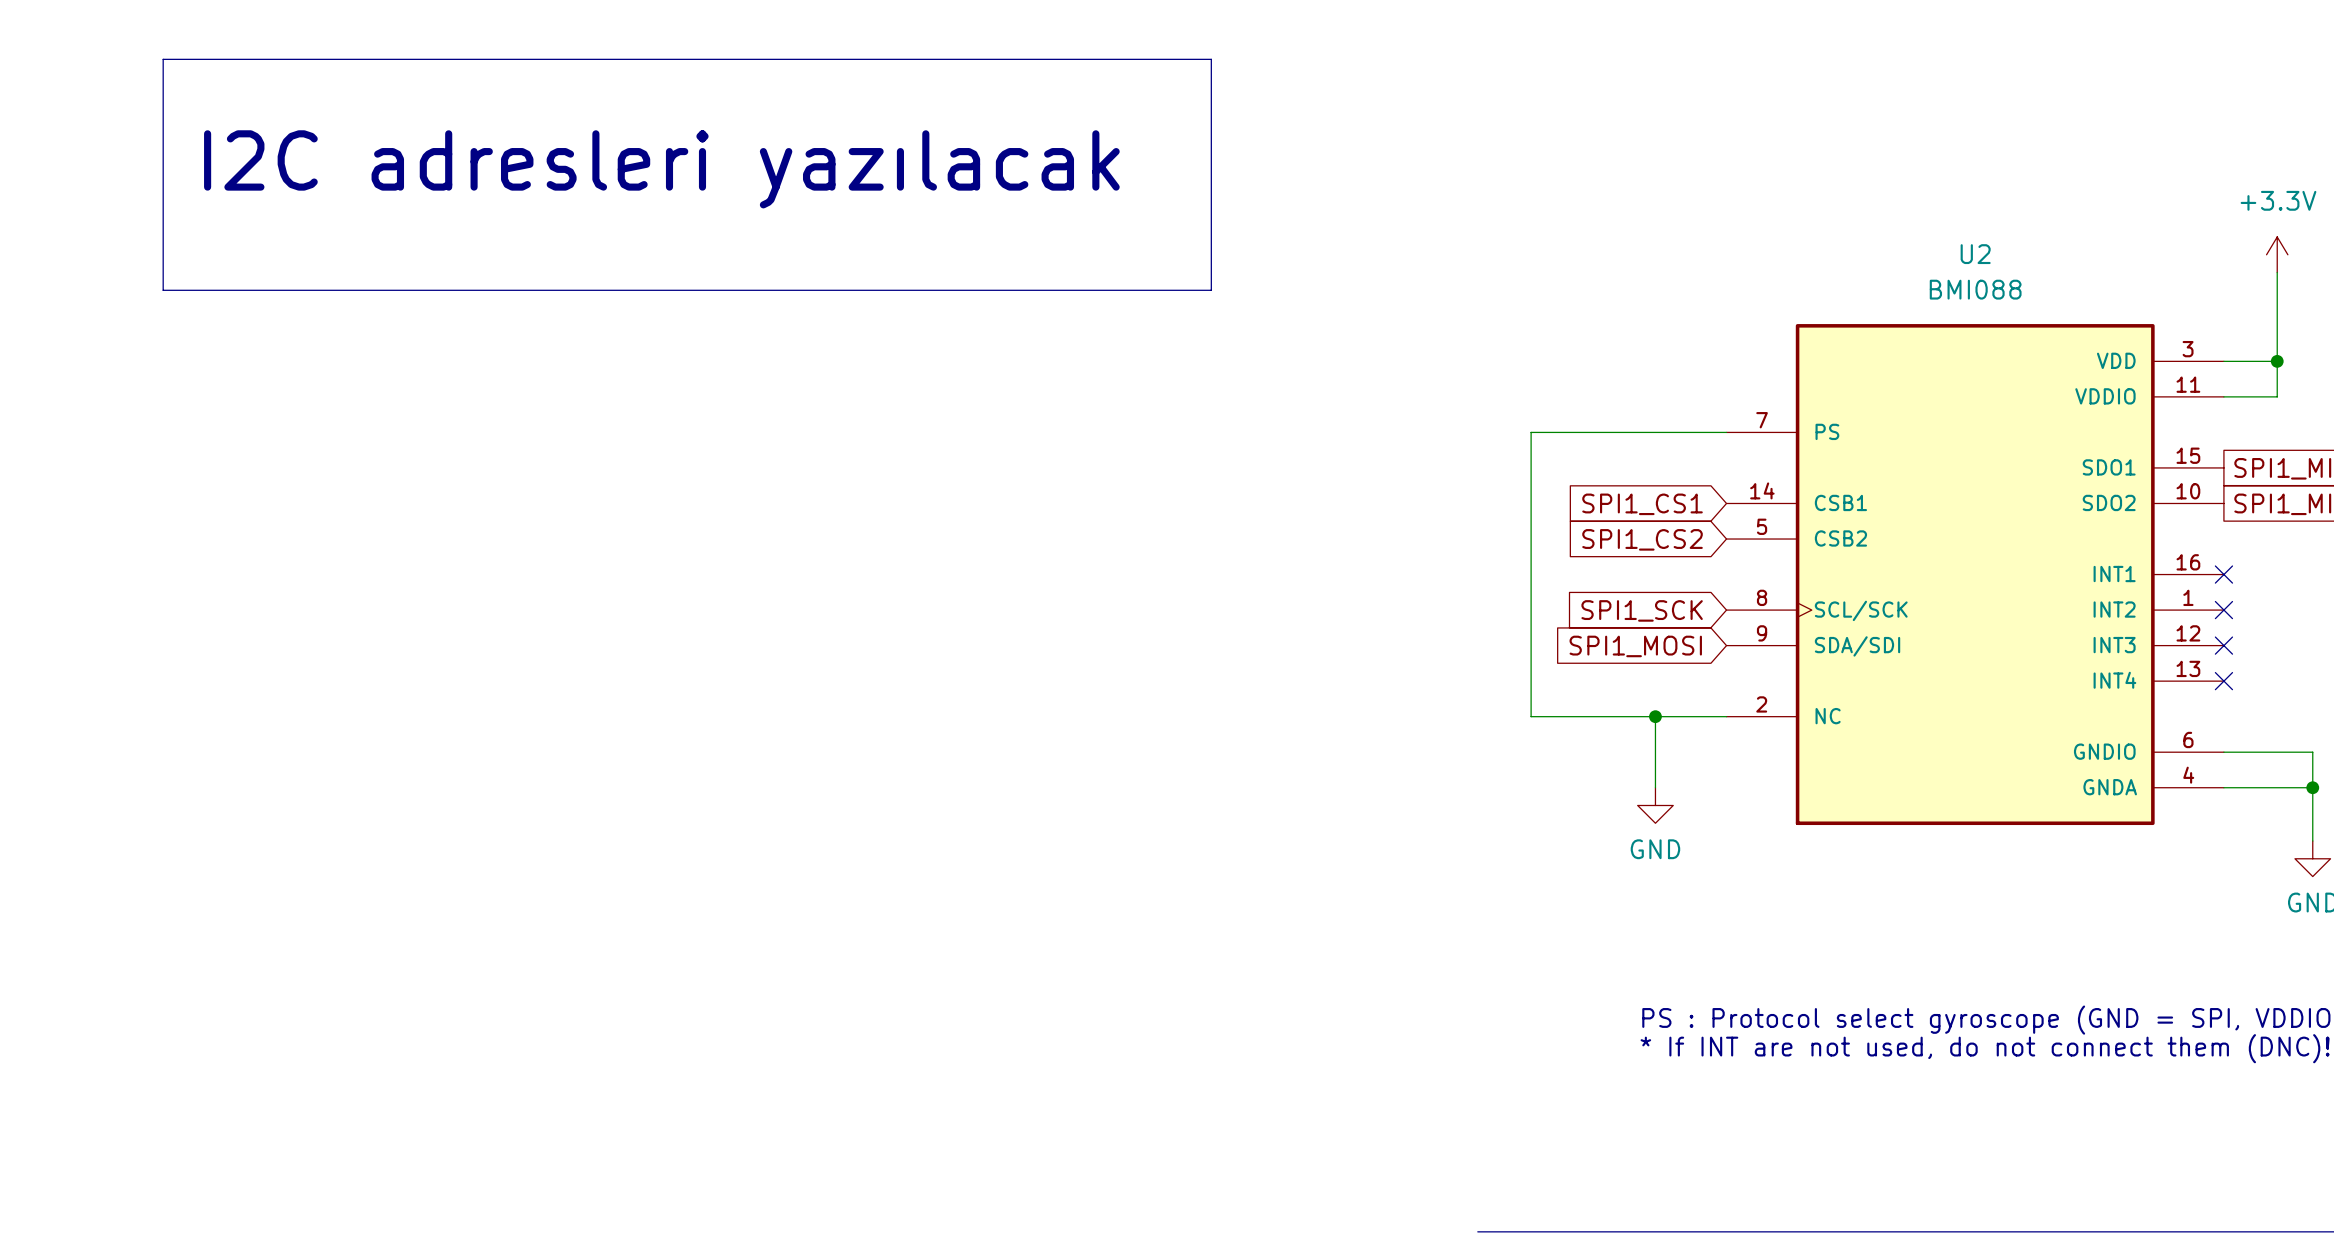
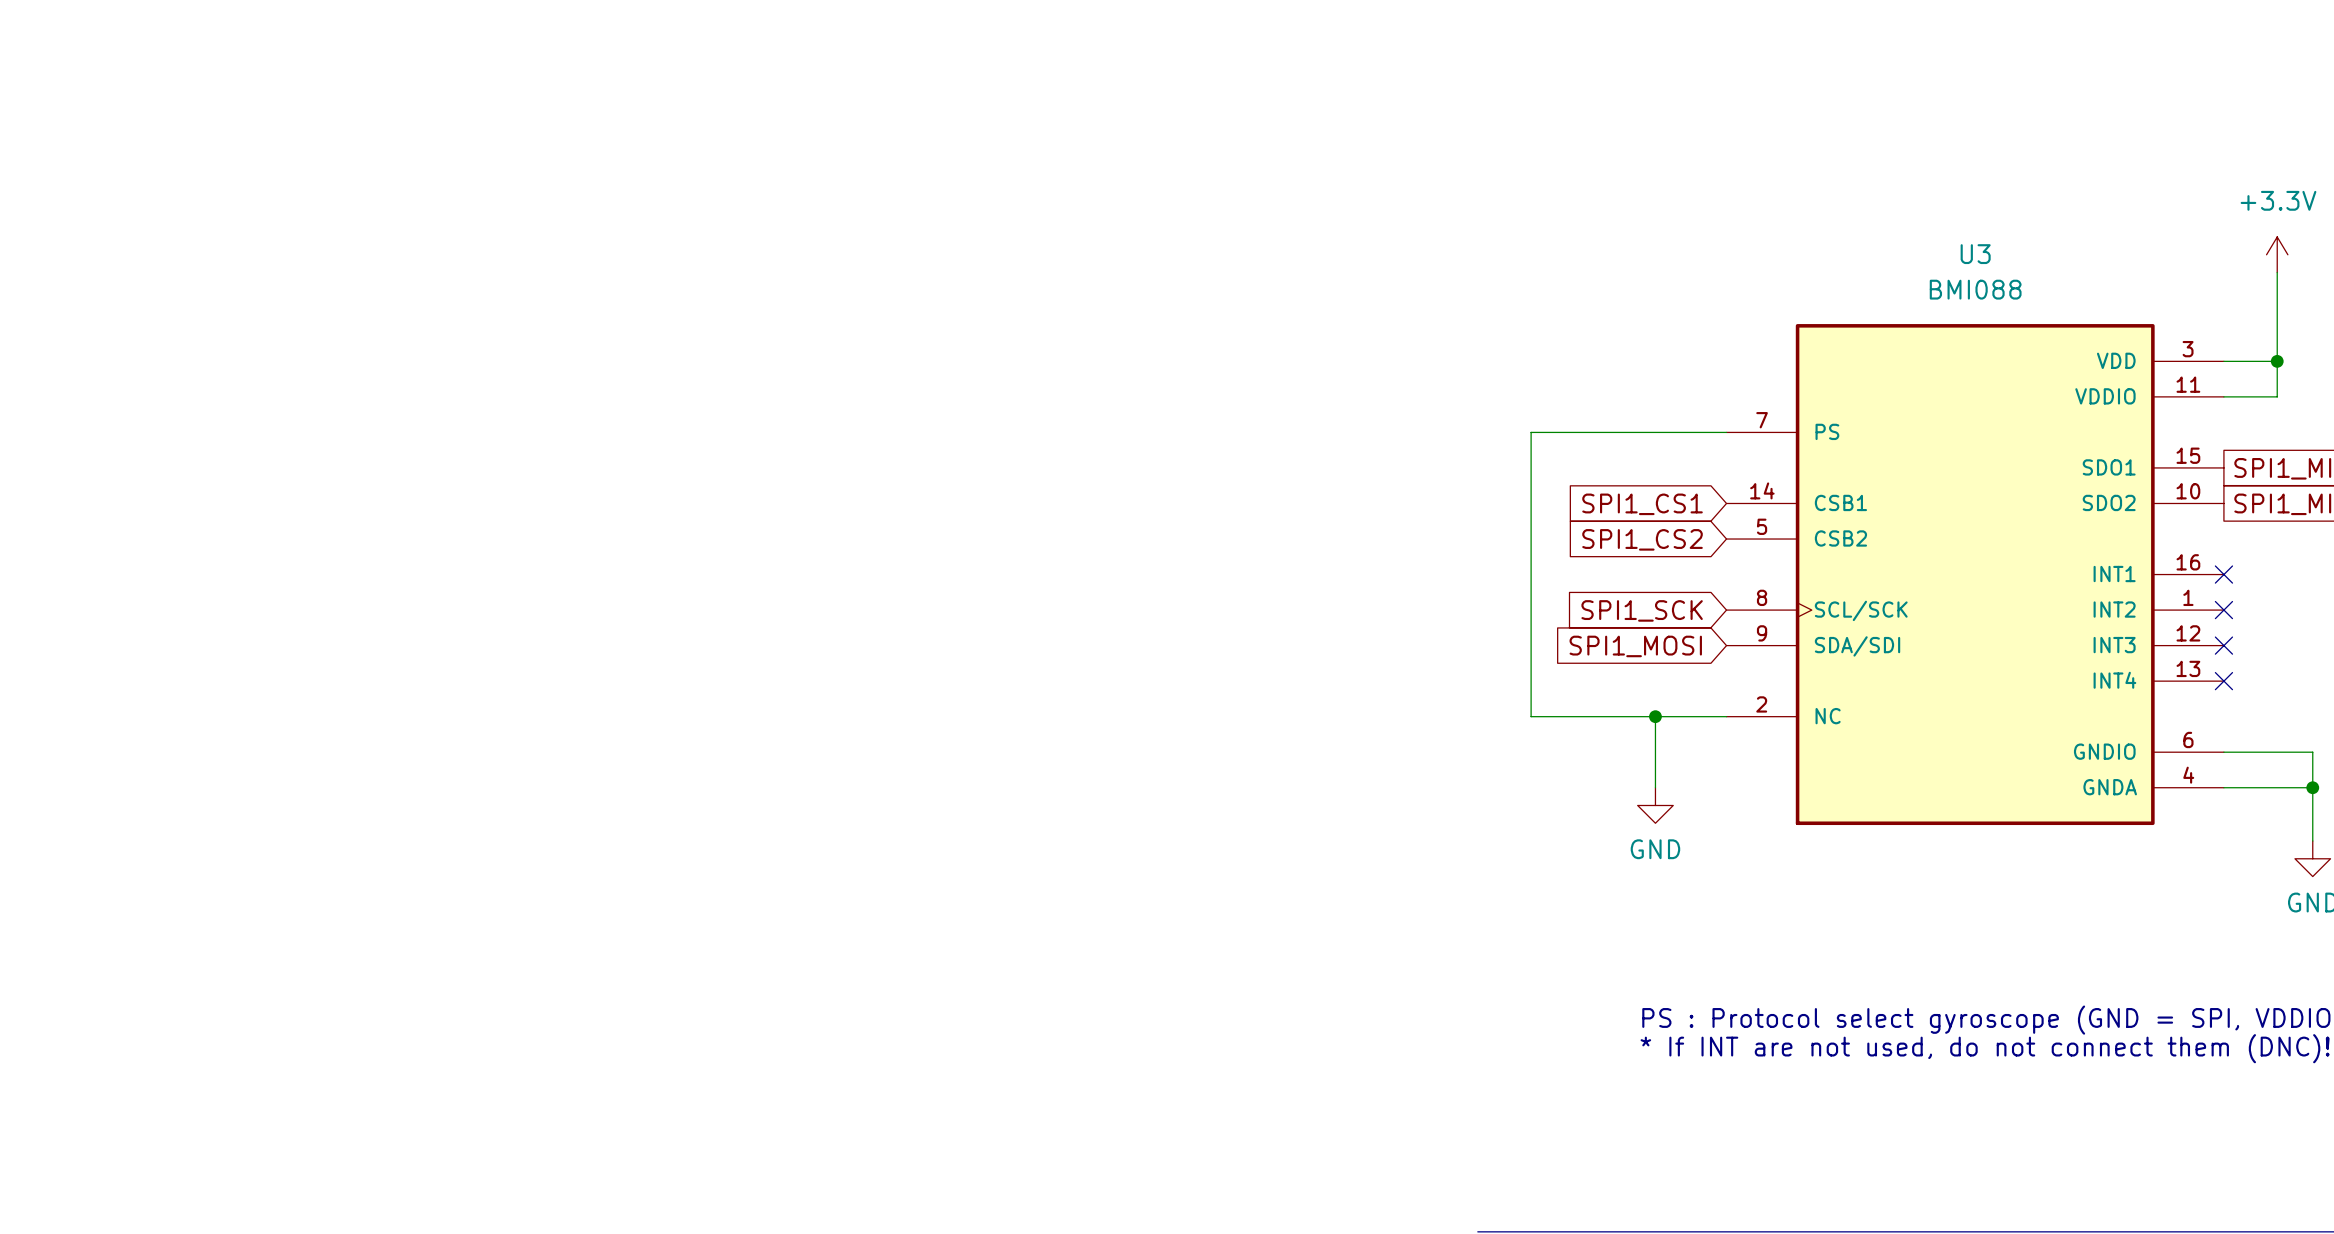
line: (163, 59) (1211, 59) (1211, 290) (163, 290) (163, 59) -> none
text: I2C adresleri yazılacak (661, 169) -> none
U2 name: U2 (1975, 254) -> U3 (1975, 254)

